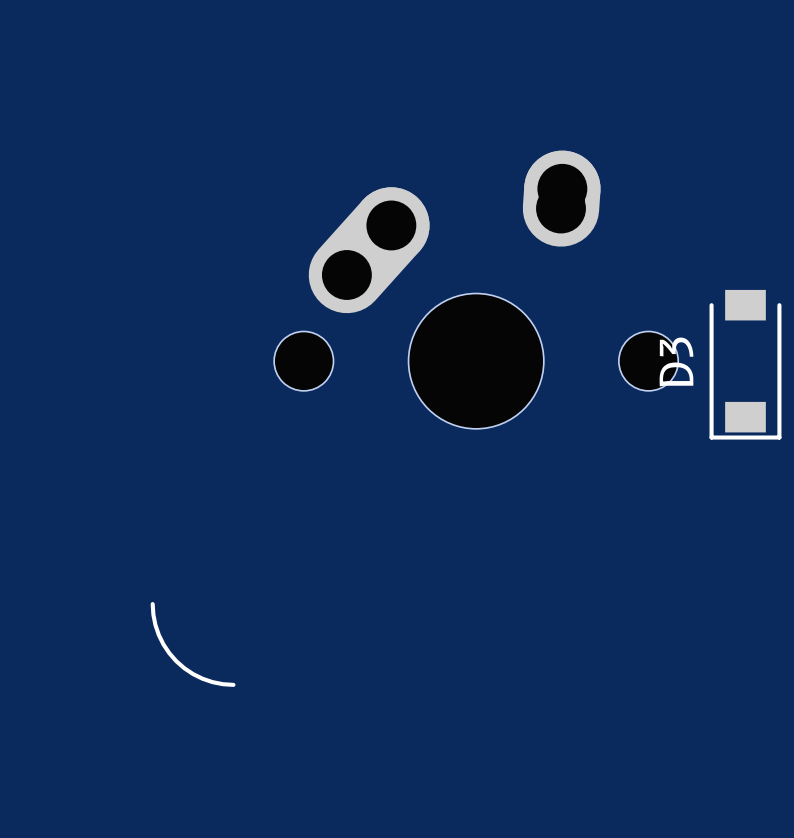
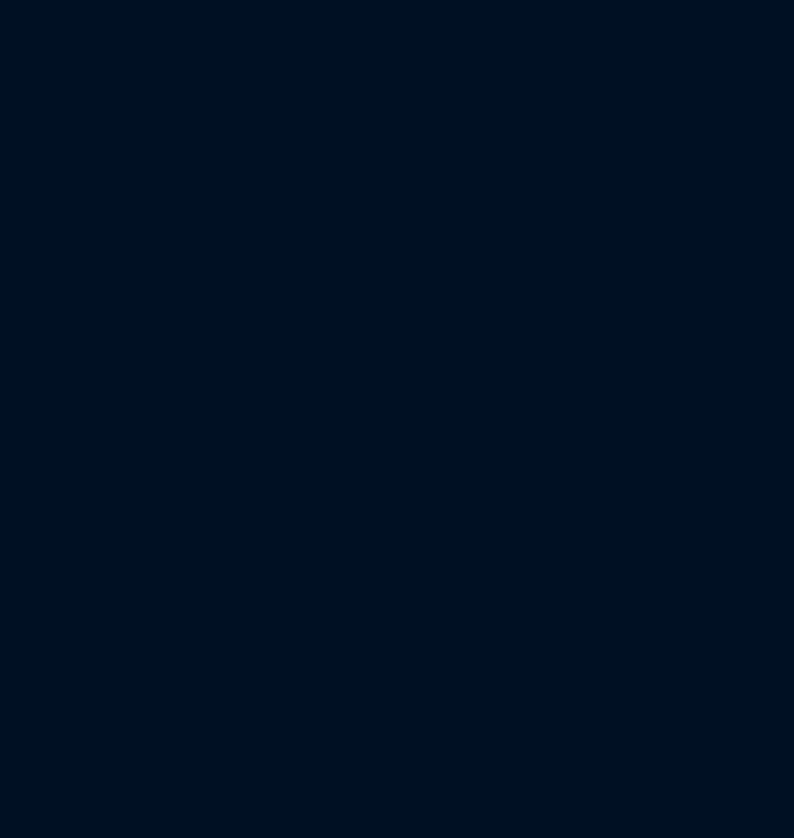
part: (476, 289) -> none
D3: (745, 364) -> none
line: (152, 604) (158, 635) (176, 661) (202, 678) (233, 684) -> none

